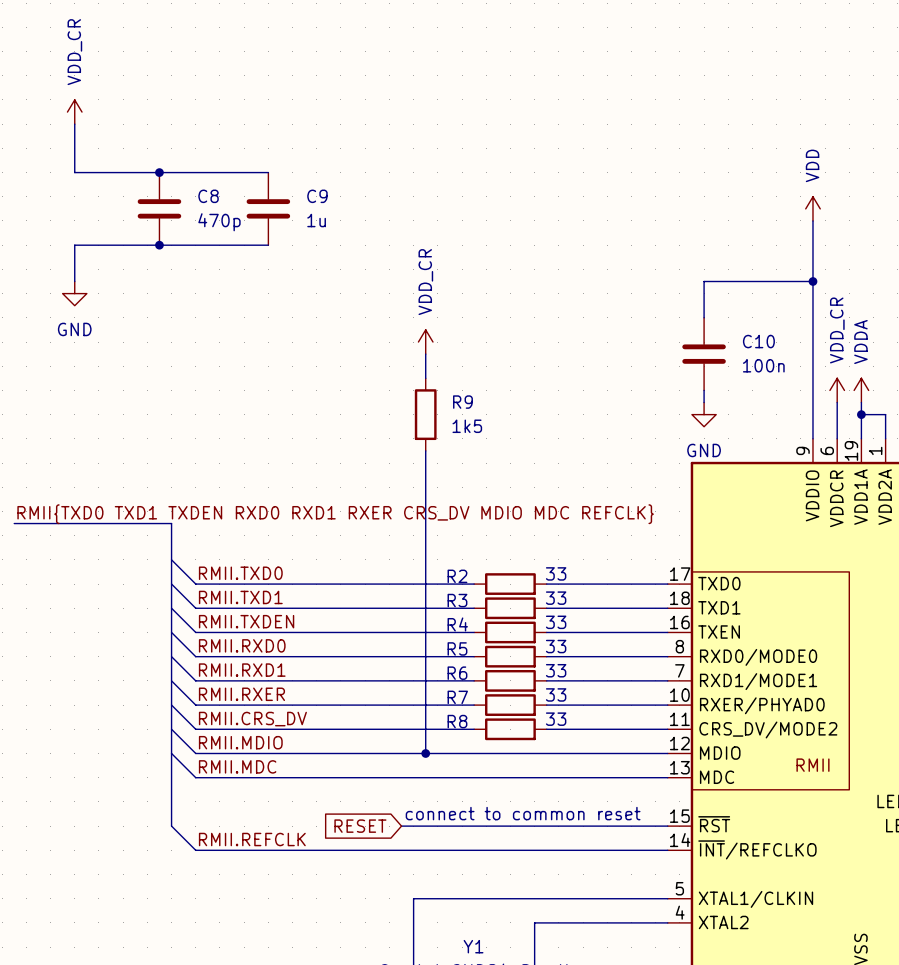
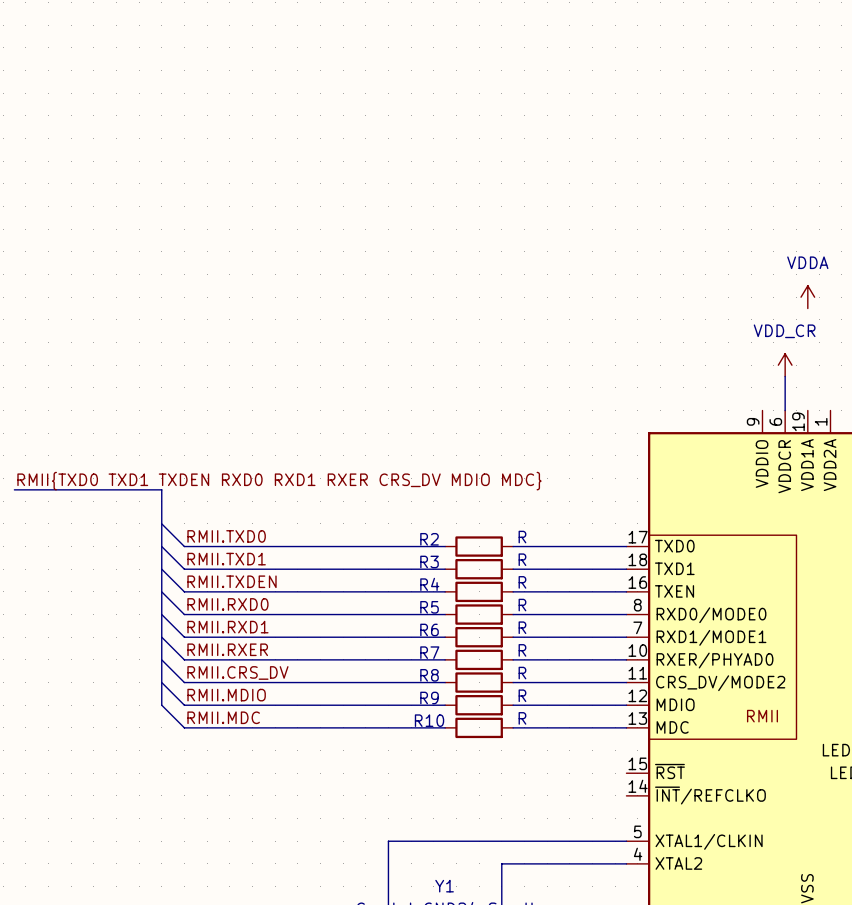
power symbol: VDD_CR (74, 112) -> none
wire: (74, 124) (74, 172) (268, 172) -> none
junction: (159, 172) -> none
C8: 470p (159, 208) -> none
C9: 1u (268, 208) -> none
power symbol: VDD (812, 208) -> none
wire: (812, 220) (812, 438) -> none
junction: (159, 245) -> none
wire: (268, 245) (74, 245) (74, 281) -> none
wire: (812, 281) (704, 281) (704, 317) -> none
junction: (812, 281) -> none
power symbol: GND (74, 293) -> none
power symbol text rotation: 0° (837, 330) -> 90° clockwise (784, 331)
power symbol: VDD_CR (425, 342) -> none
power symbol text rotation: 0° (860, 342) -> 90° clockwise (807, 262)
wire: (425, 354) (425, 378) -> none
C10: 100n (704, 354) -> none
wire: (704, 390) (704, 402) -> none
power symbol position: VDDA (861, 390) -> VDDA (807, 297)
R9 name position: R9 (462, 402) -> R9 (429, 697)
wire: (861, 402) (861, 438) -> none
R9 rotation: 0° (425, 414) -> 90° clockwise (479, 705)
R9 position: (425, 414) -> (479, 705)
power symbol: GND (704, 414) -> none
wire: (861, 414) (885, 414) (885, 438) -> none
junction: (861, 414) -> none
R9 value: 1k5 (467, 426) -> R (522, 695)
wire: (425, 450) (425, 753) -> none
label: RMII{TXD0 TXD1 TXDEN RXD0 RXD1 RXER CRS_DV MDIO MDC REFCLK} (335, 514) -> RMII{TXD0 TXD1 TXDEN RXD0 RXD1 RXER CRS_DV MDIO MDC} (279, 481)
R2 value: 33 (556, 573) -> R (522, 537)
R3 value: 33 (556, 598) -> R (522, 559)
R4 value: 33 (556, 622) -> R (522, 582)
R5 value: 33 (556, 646) -> R (522, 605)
R6 value: 33 (556, 670) -> R (522, 627)
R7 value: 33 (556, 694) -> R (522, 650)
R8 value: 33 (556, 719) -> R (522, 673)
bus: (171, 753) (171, 826) -> none
junction: (425, 753) -> none
wire: (474, 753) (546, 753) -> none
wire: (474, 777) (546, 777) -> none
R10: none -> R (479, 727)
text: connect to common reset (523, 813) -> none
wire: (171, 826) (195, 850) (667, 850) -> none
global label: RESET (360, 826) -> none
wire: (401, 826) (667, 826) -> none
label: RMII.REFCLK (252, 839) -> none

